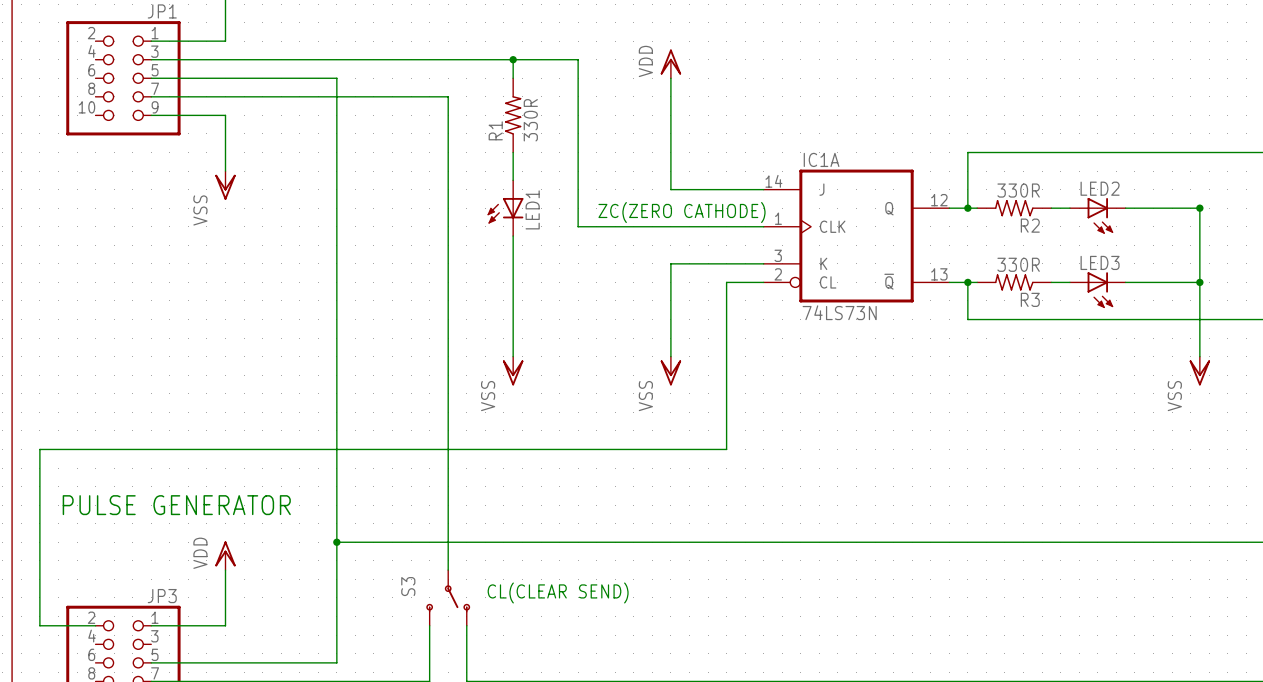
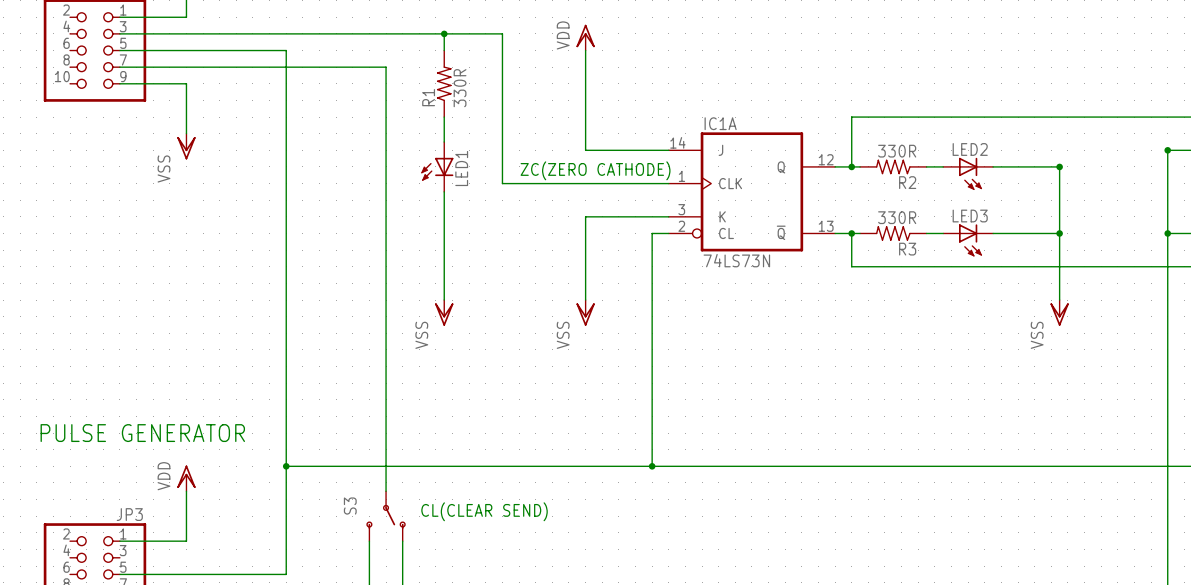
wire: (745, 282) (726, 282) (726, 449) (39, 449) (39, 625) (95, 625) -> (652, 233) (652, 466)
junction: none -> (652, 466)

